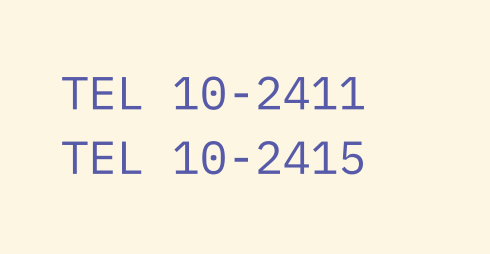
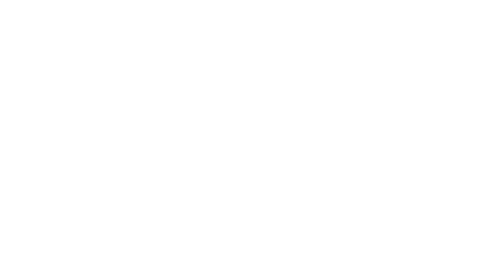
text: TEL 10-2411 (213, 93) -> none
text: TEL 10-2415 (212, 157) -> none

